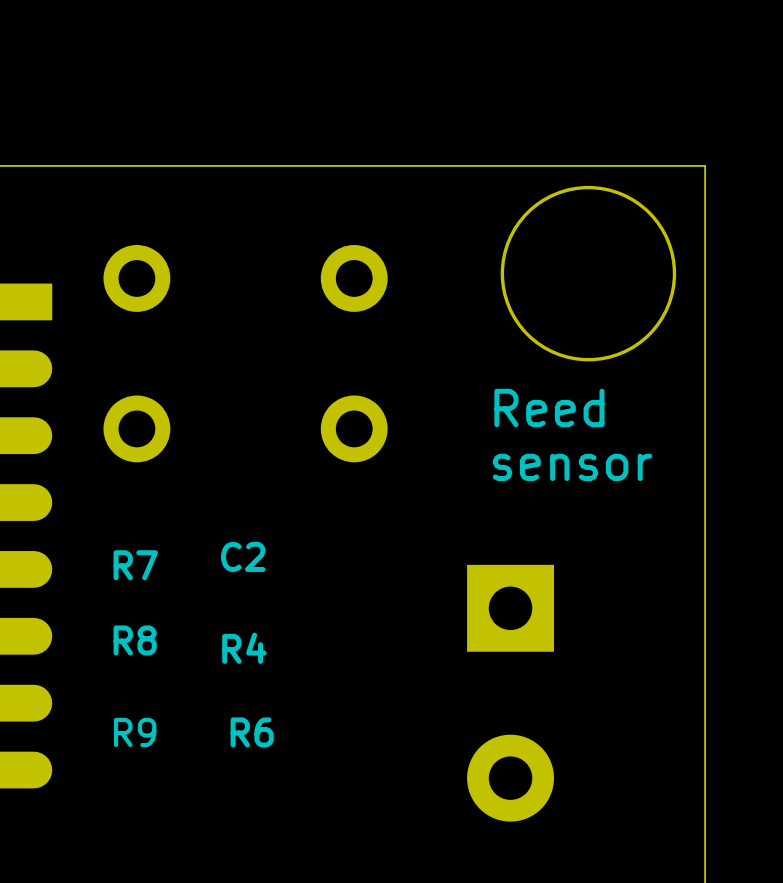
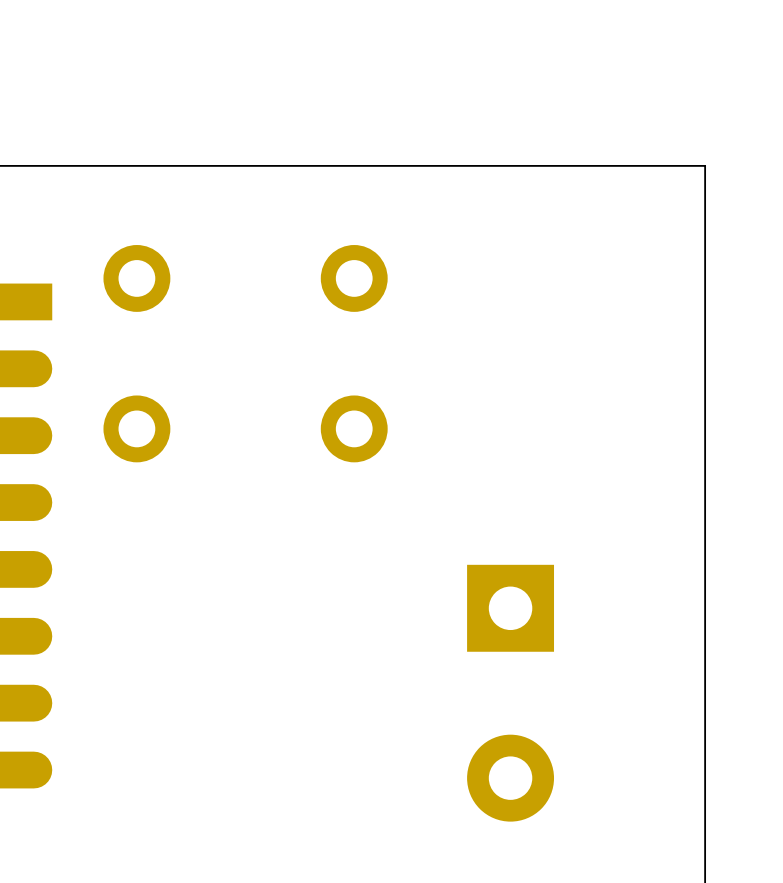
round board edge: [500, 185, 677, 362] -> none
text: Reed (549, 407) -> none
text: sensor (572, 467) -> none
C2: (243, 556) -> none
R7: (135, 565) -> none
R8: (135, 640) -> none
R4: (244, 648) -> none
R9: (135, 732) -> none
R6: (252, 732) -> none

